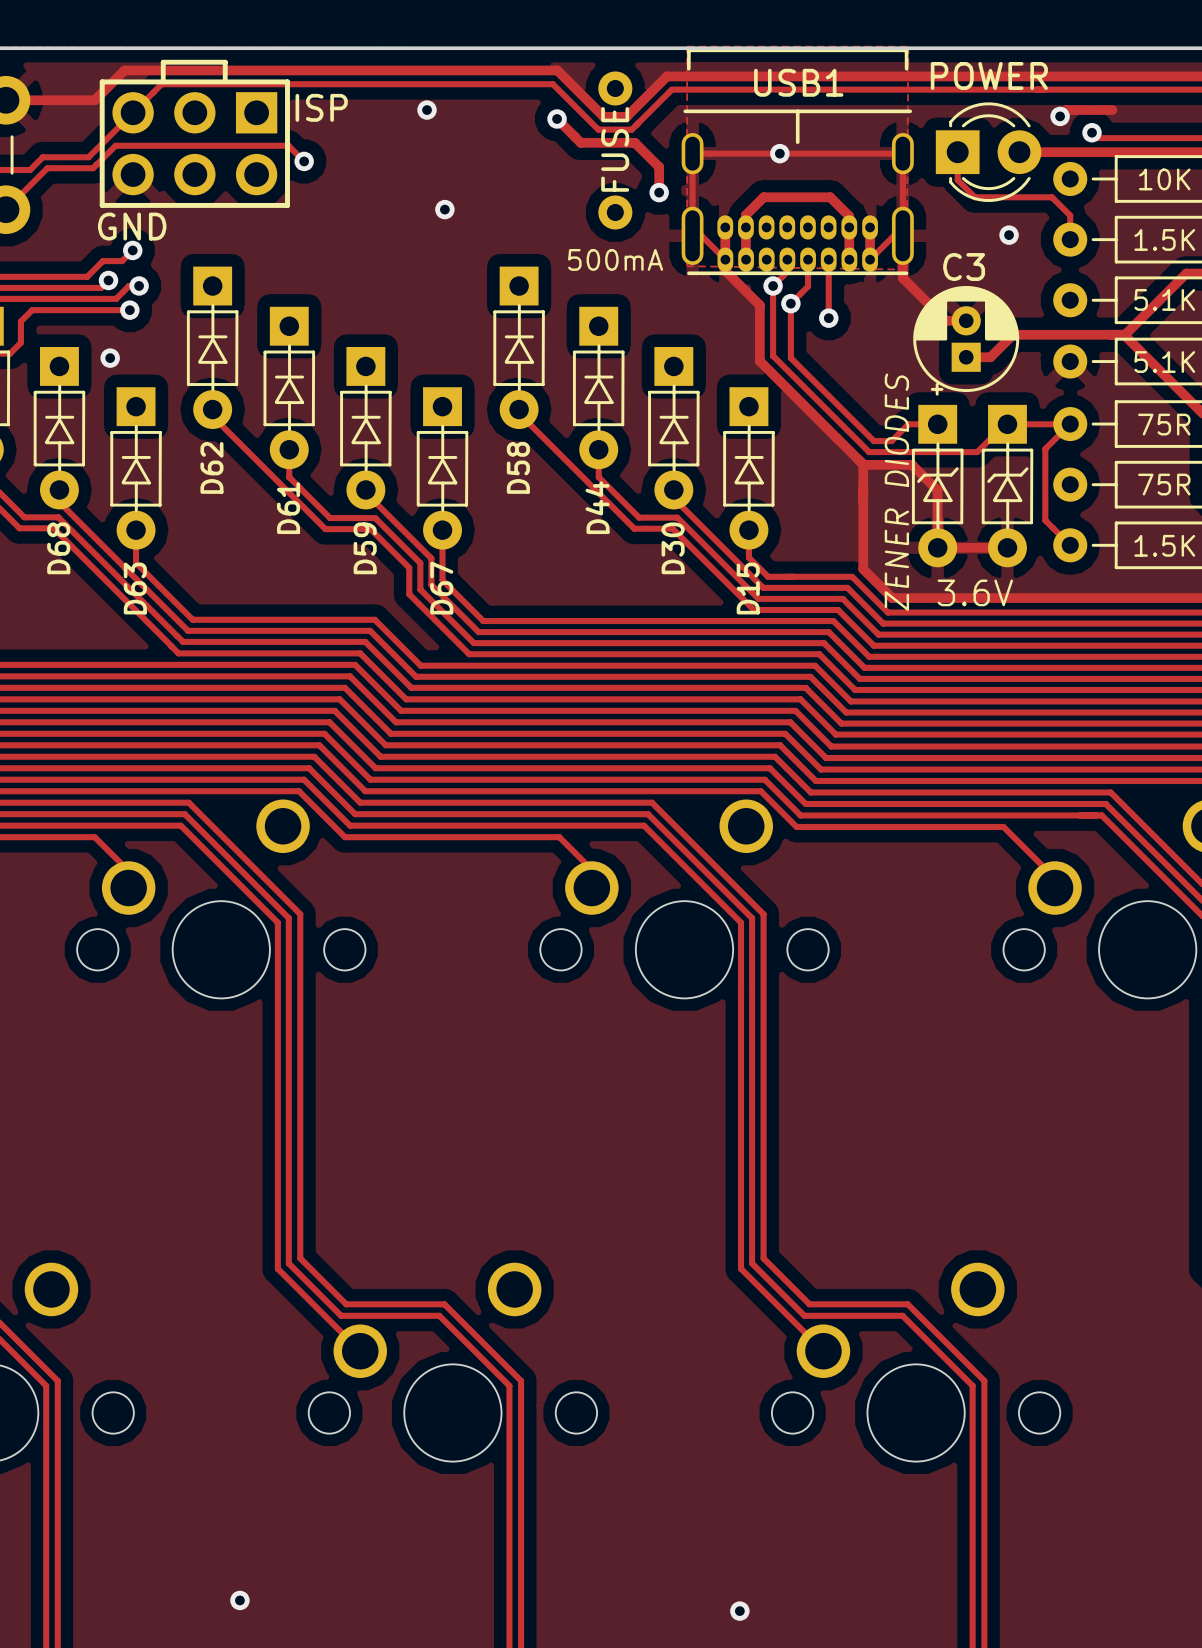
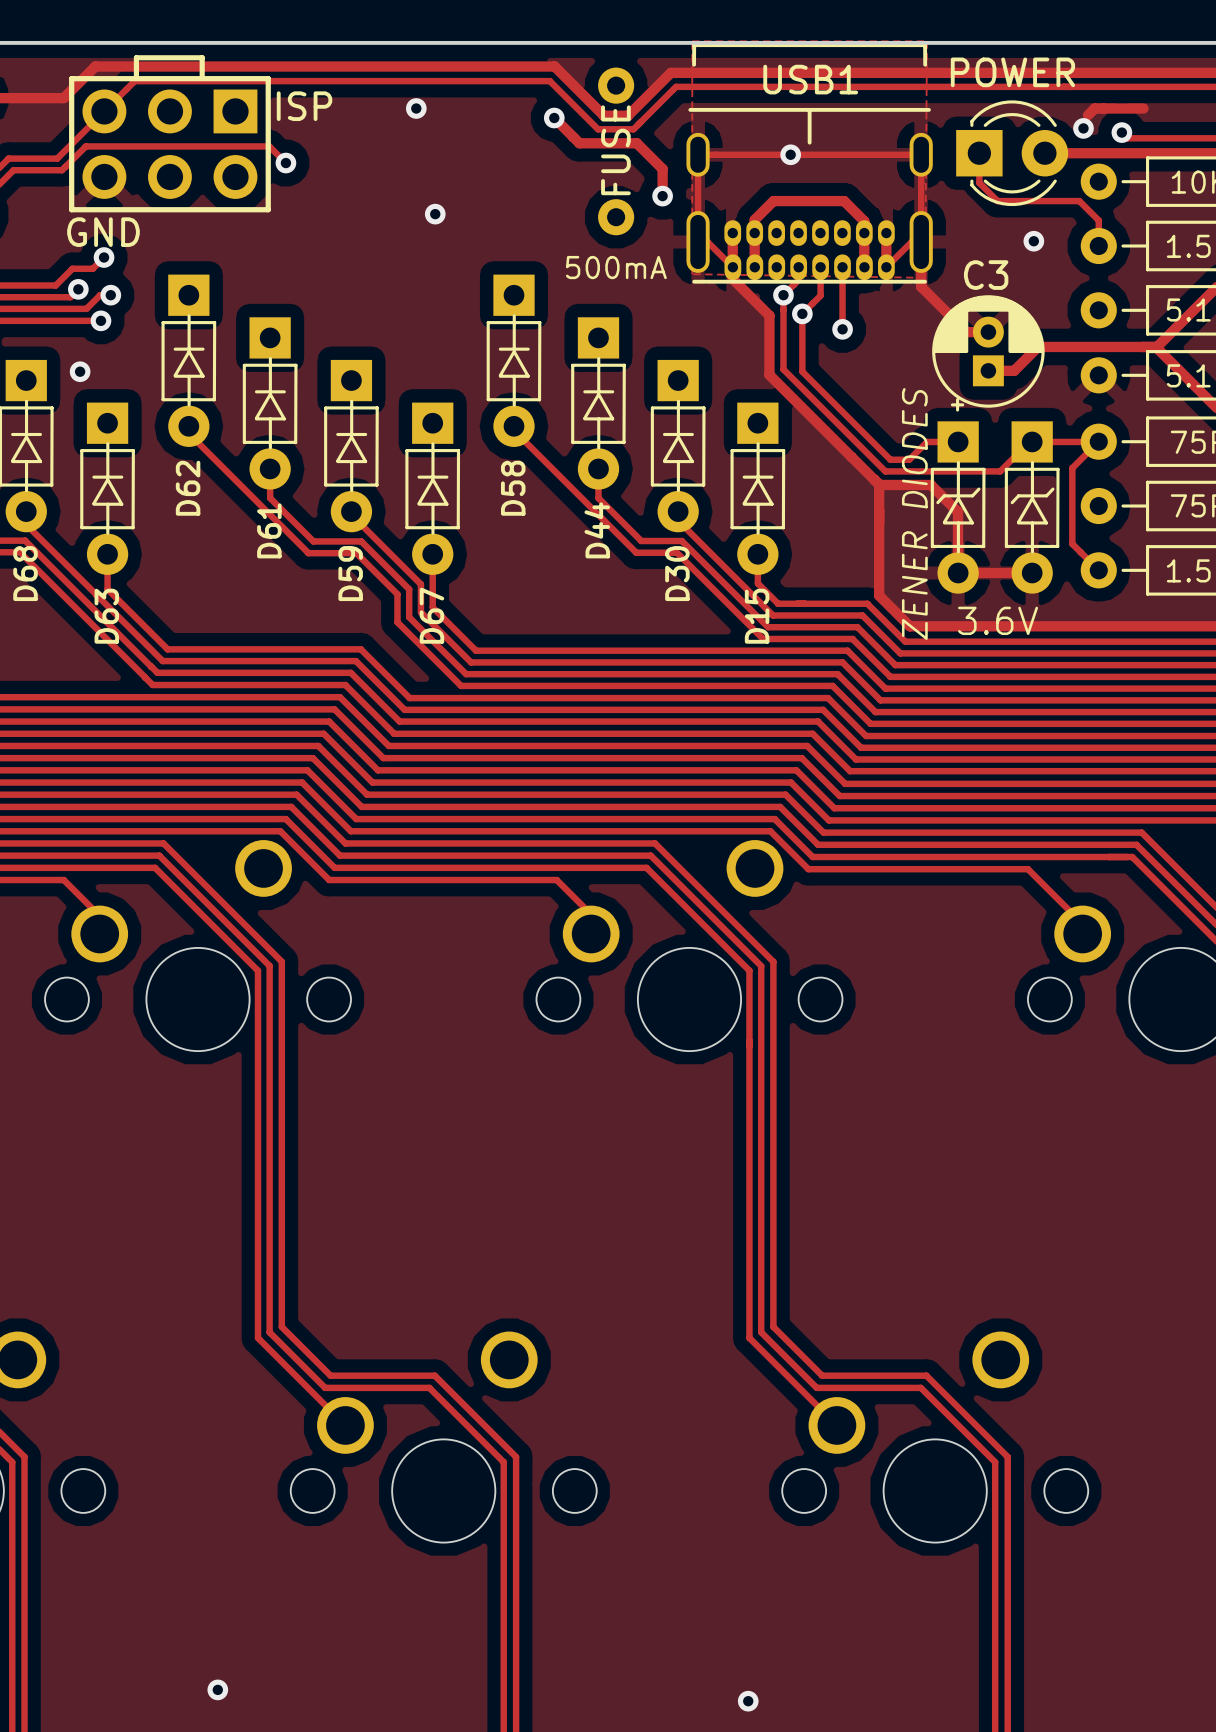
via position: (1060, 116) -> (1083, 128)

